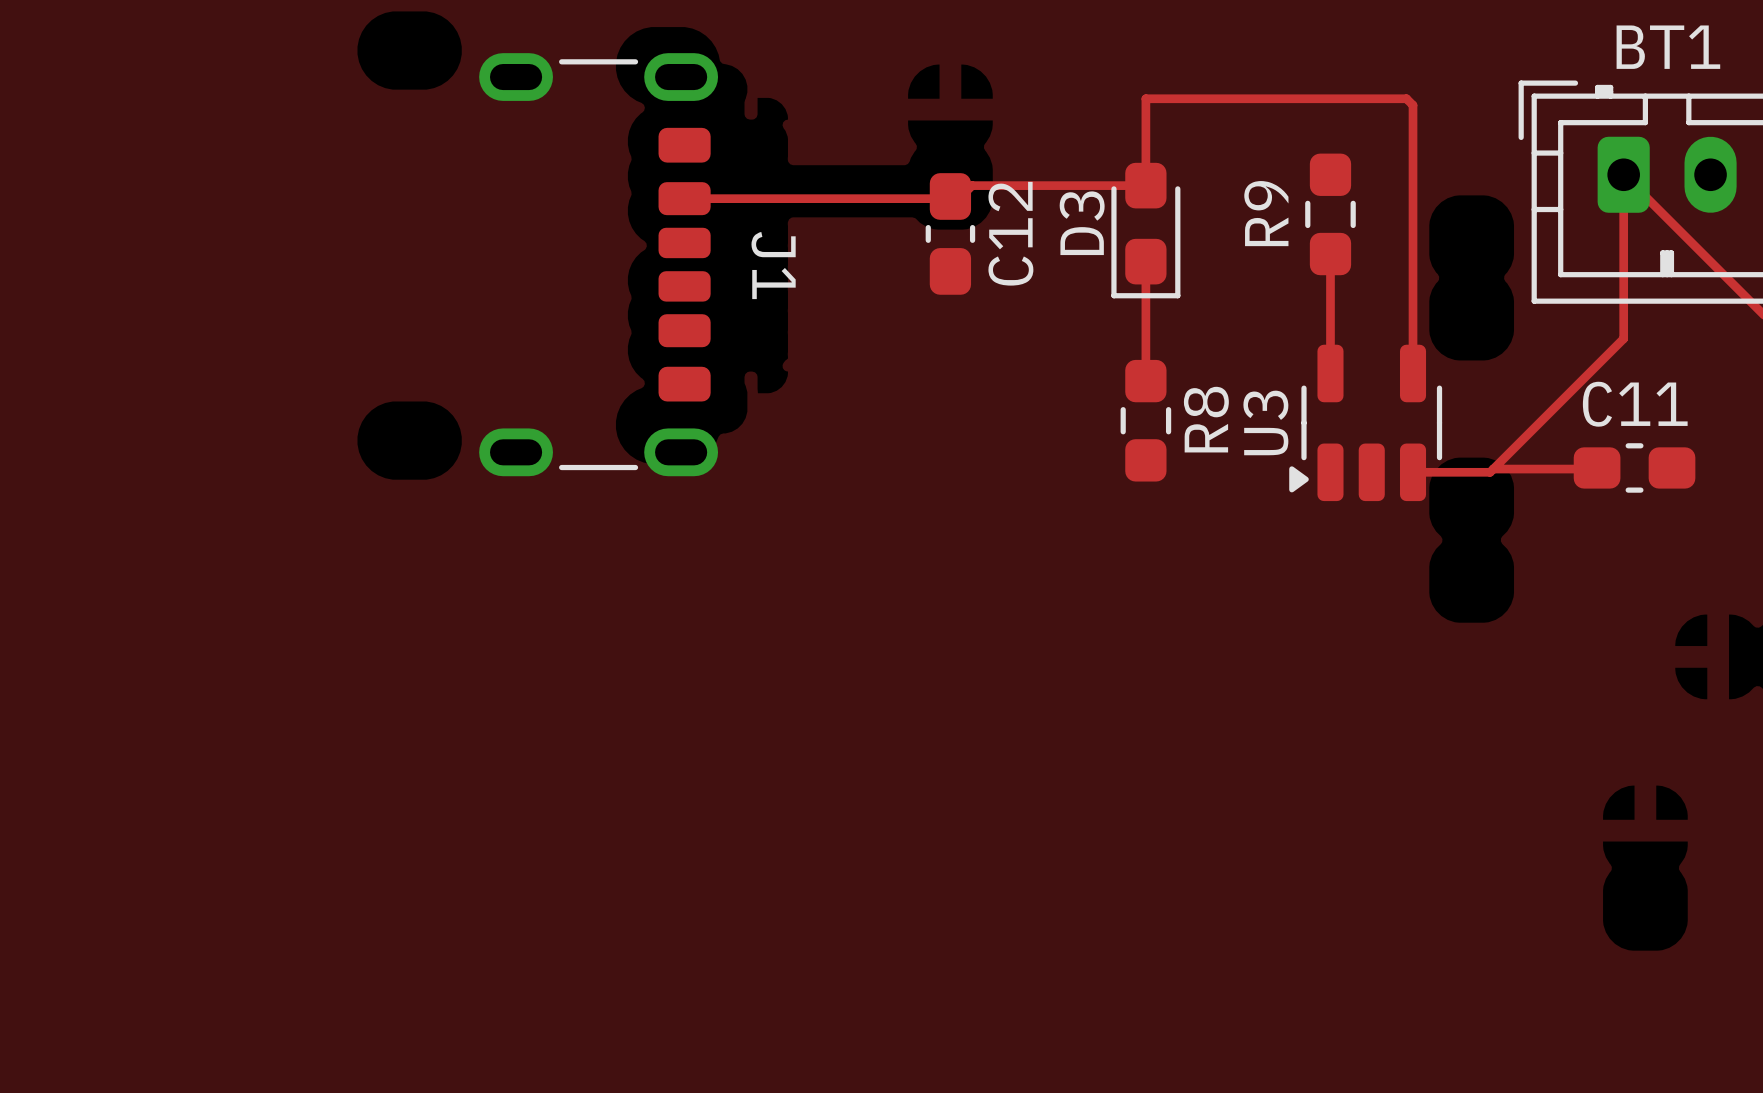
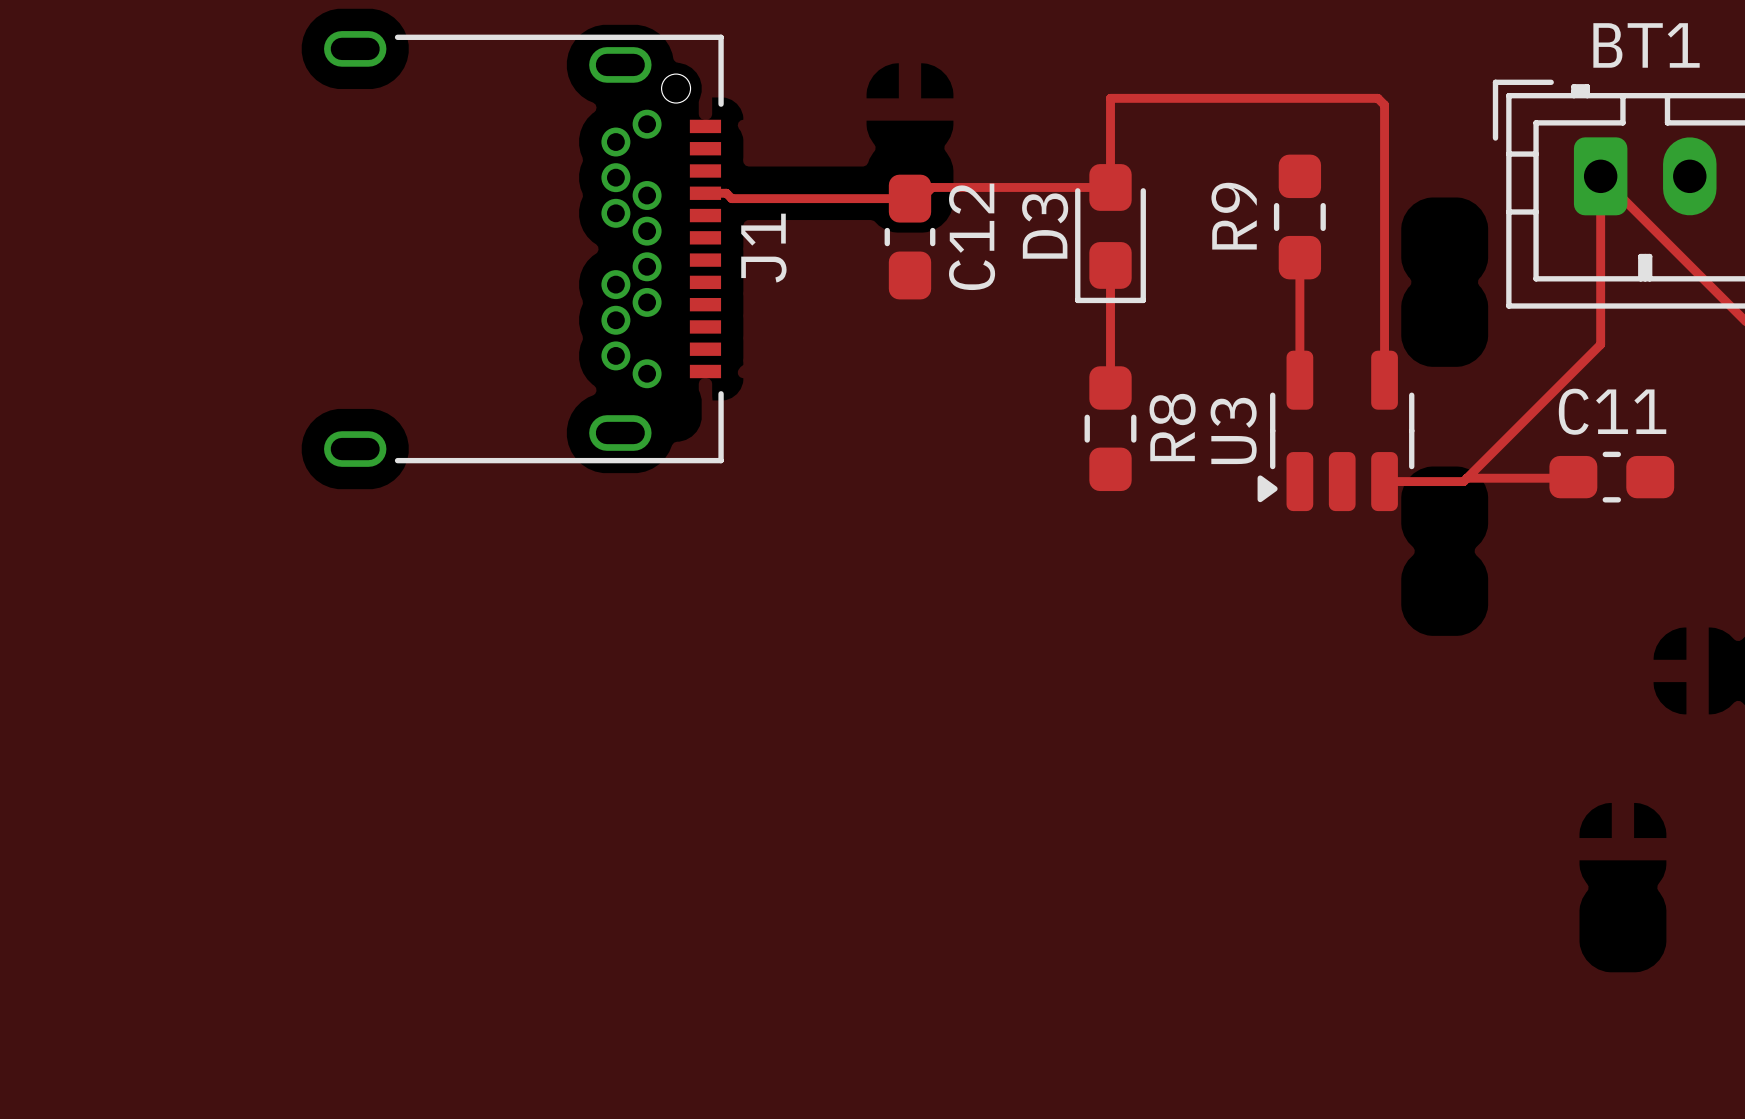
J1 footprint: [479, 53, 719, 477] -> [324, 31, 724, 467]
top track: (950, 196) (948, 198) (684, 198) -> (909, 198) (731, 198) (726, 193) (705, 193)

